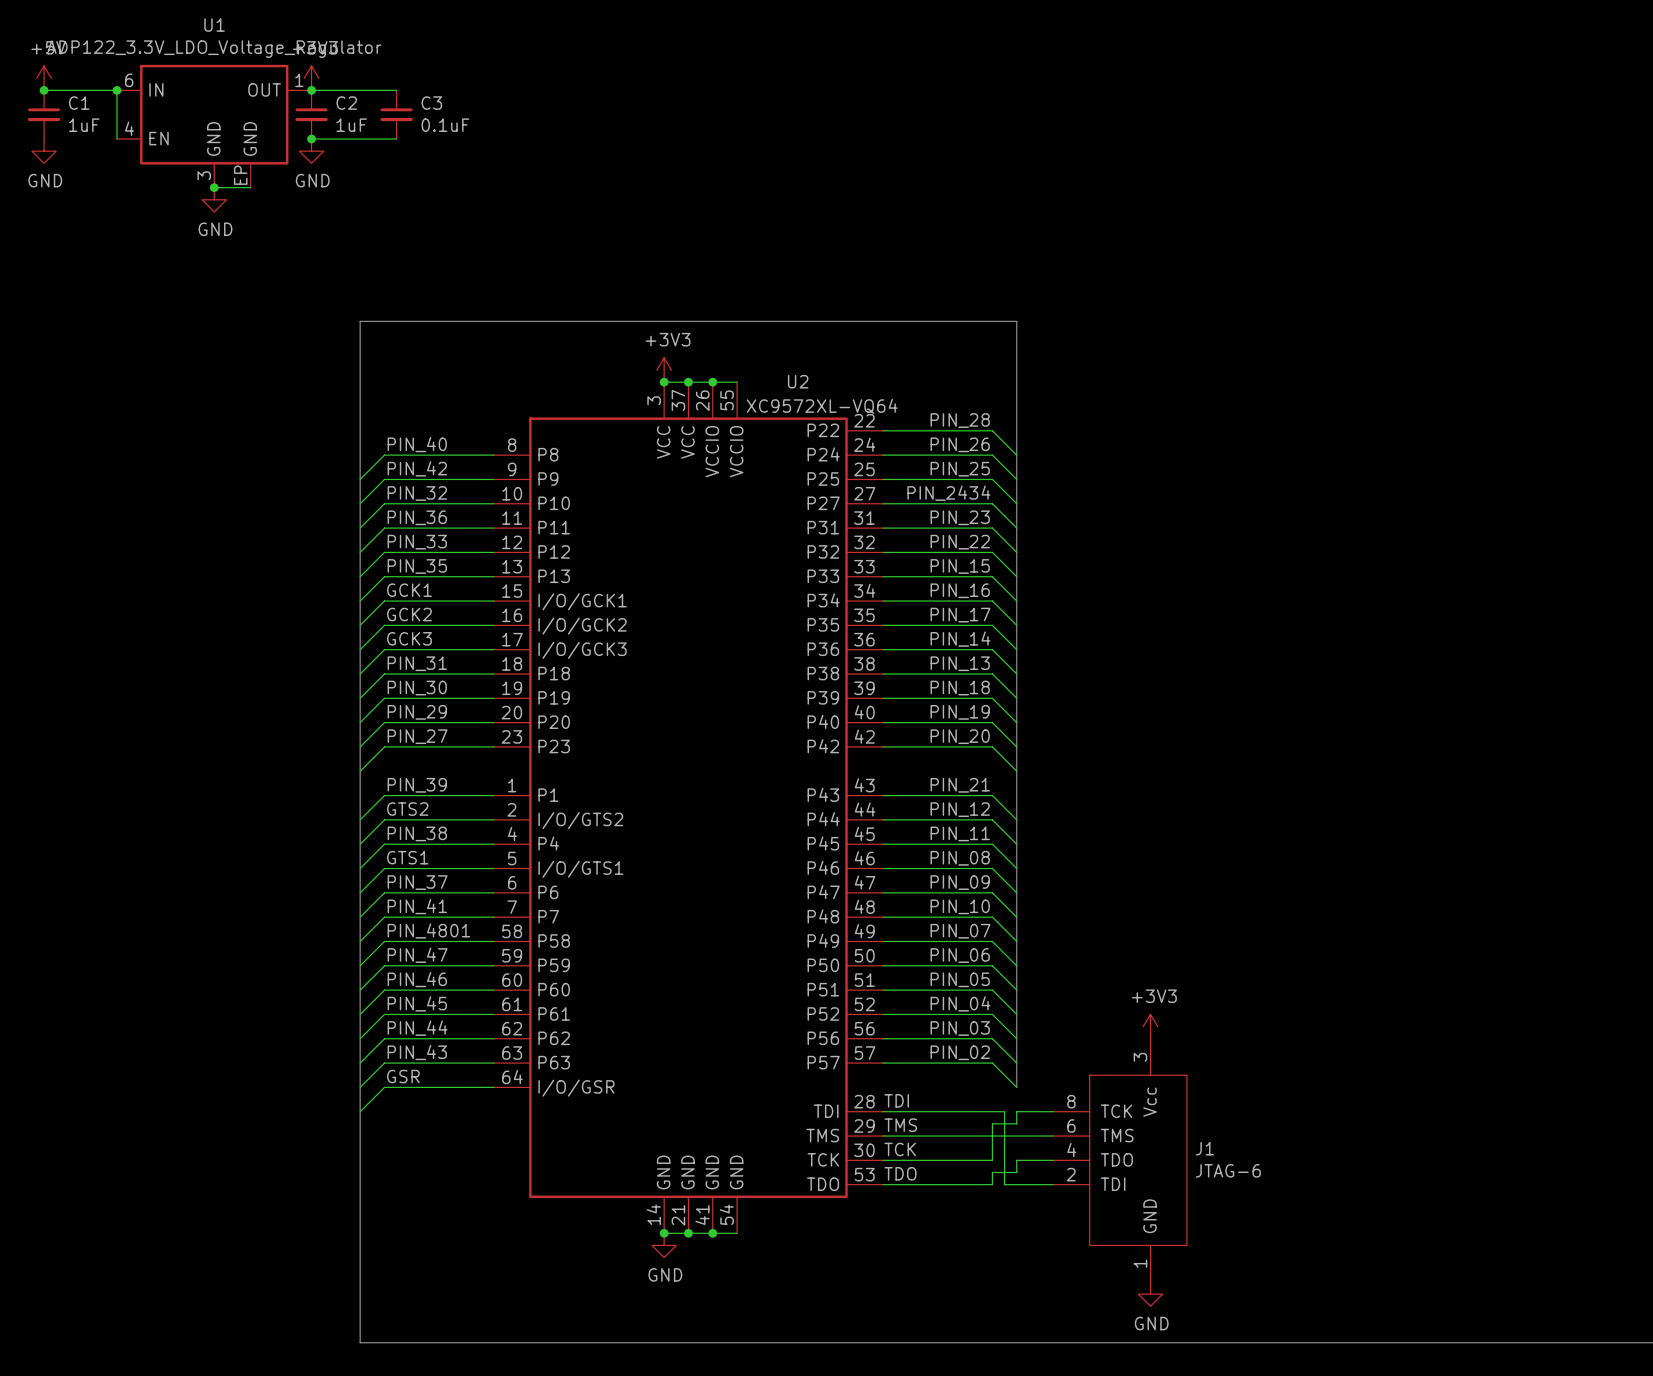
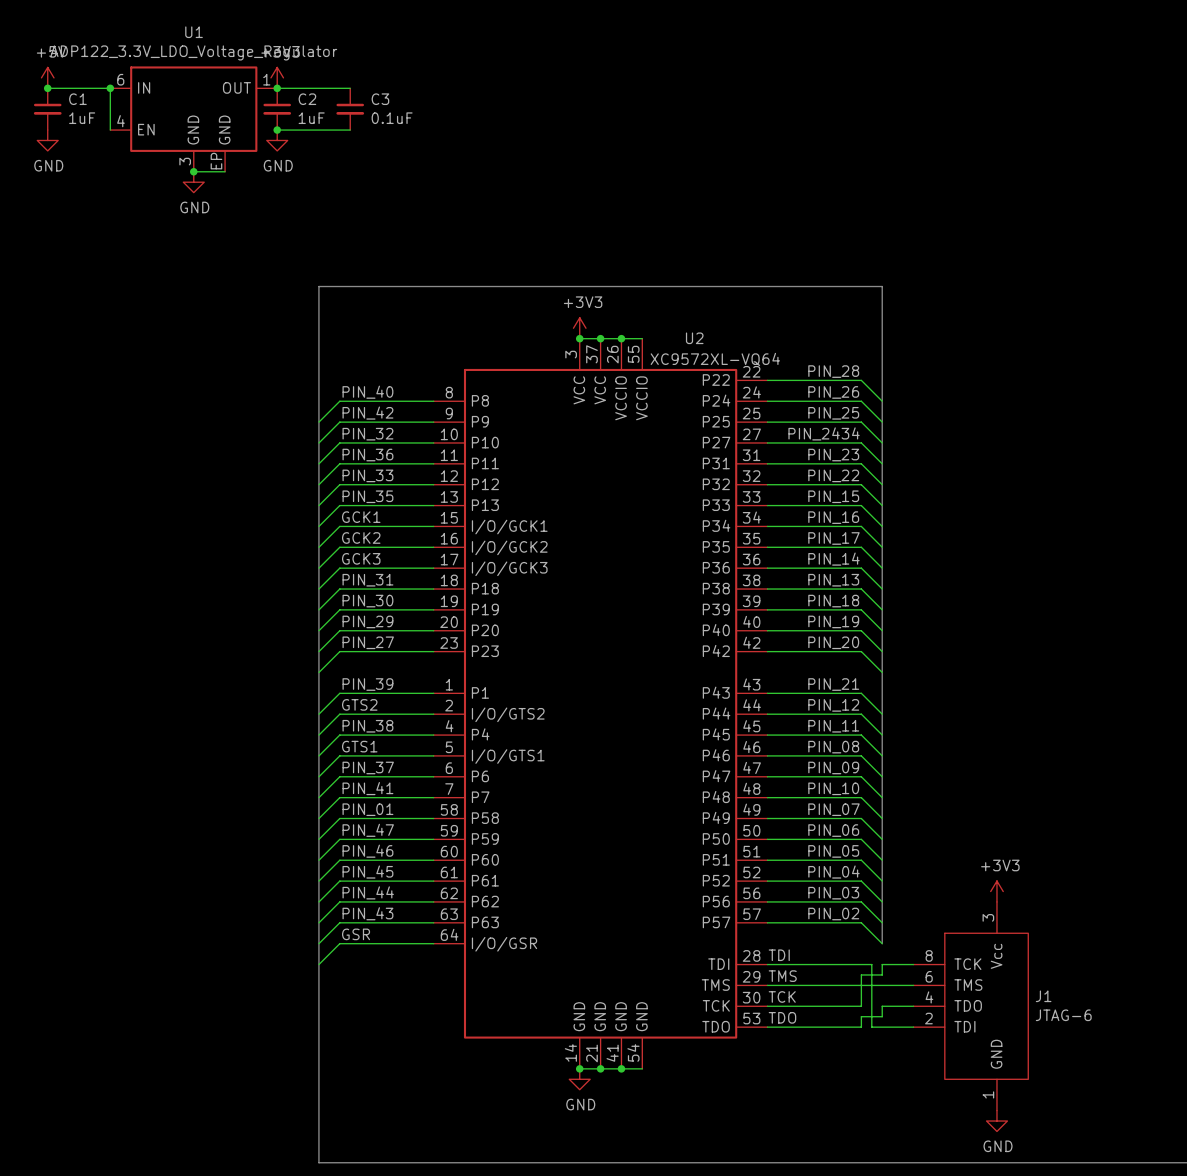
label: PIN_4801 (428, 930) -> PIN_01 (367, 809)

